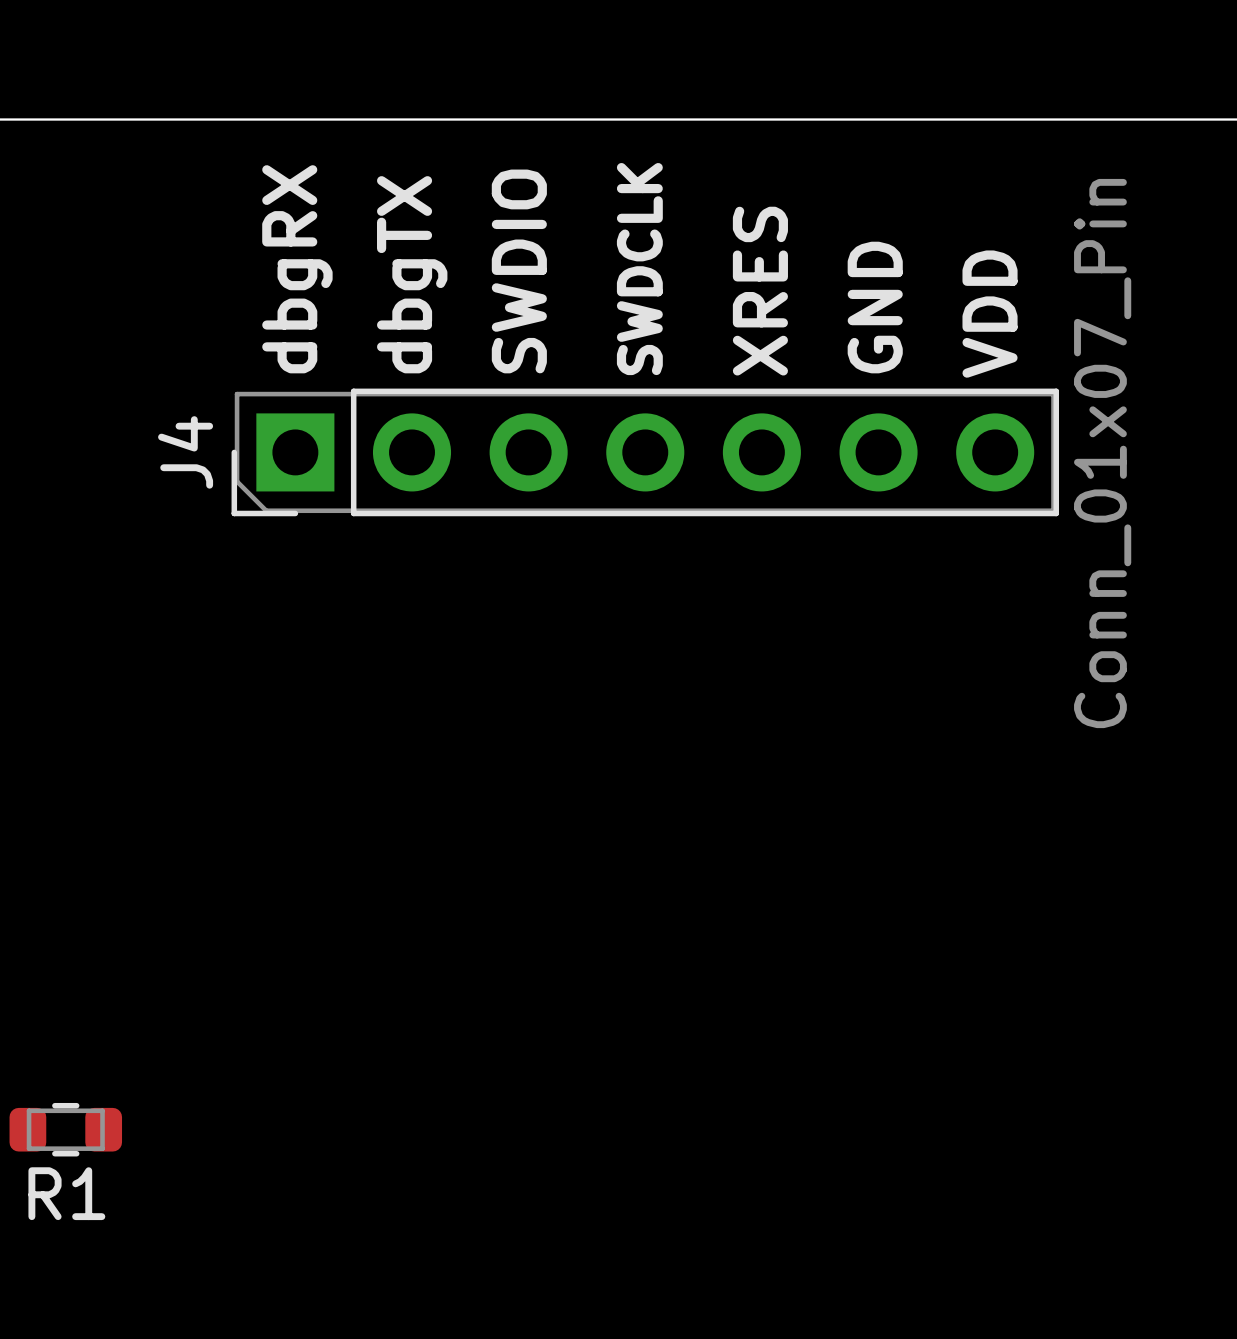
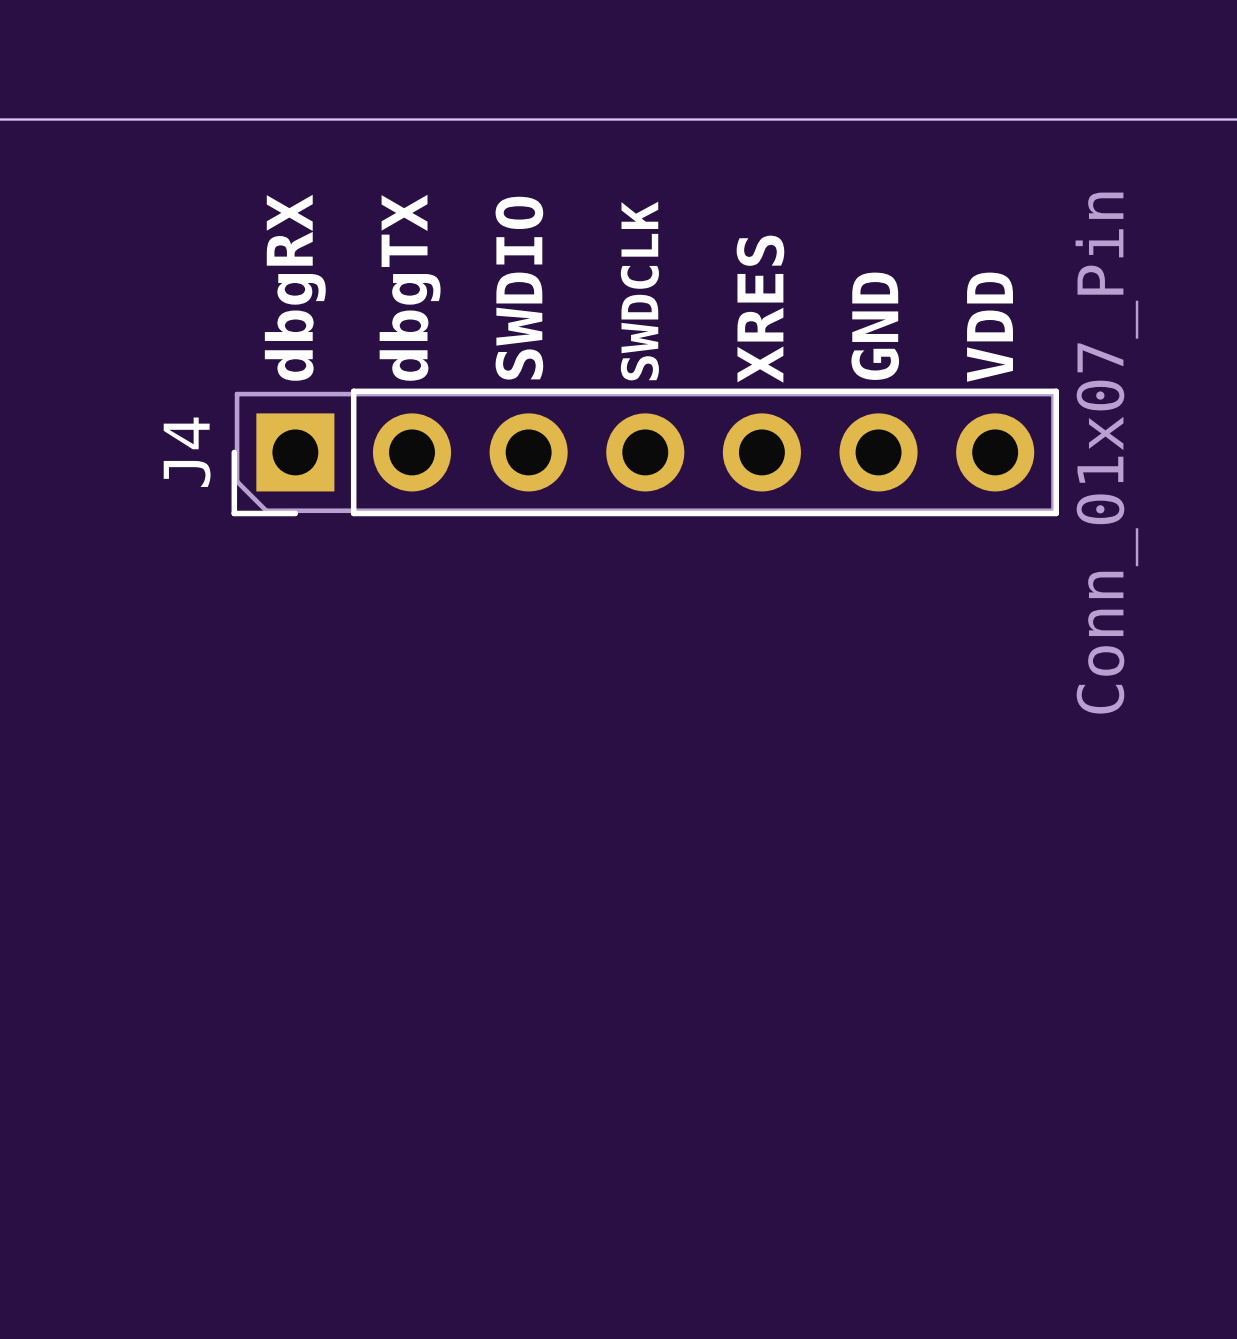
R1: (65, 1129) -> none

